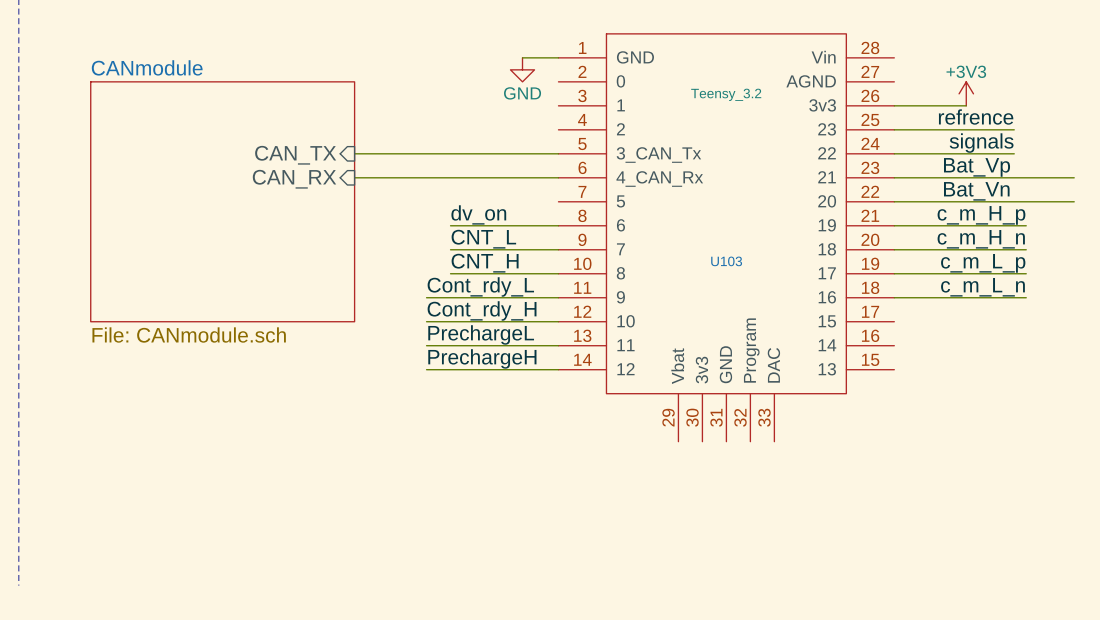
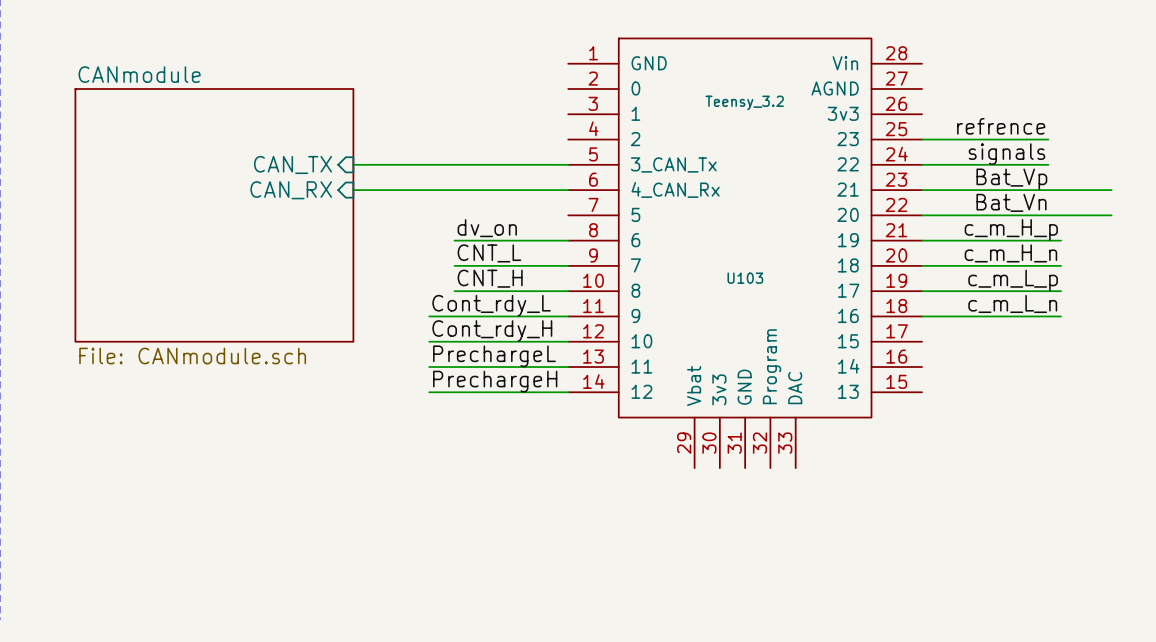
wire: (522, 57) (558, 57) -> none
power symbol: GND (522, 69) -> none
power symbol: +3V3 (966, 93) -> none
wire: (894, 105) (966, 105) -> none

